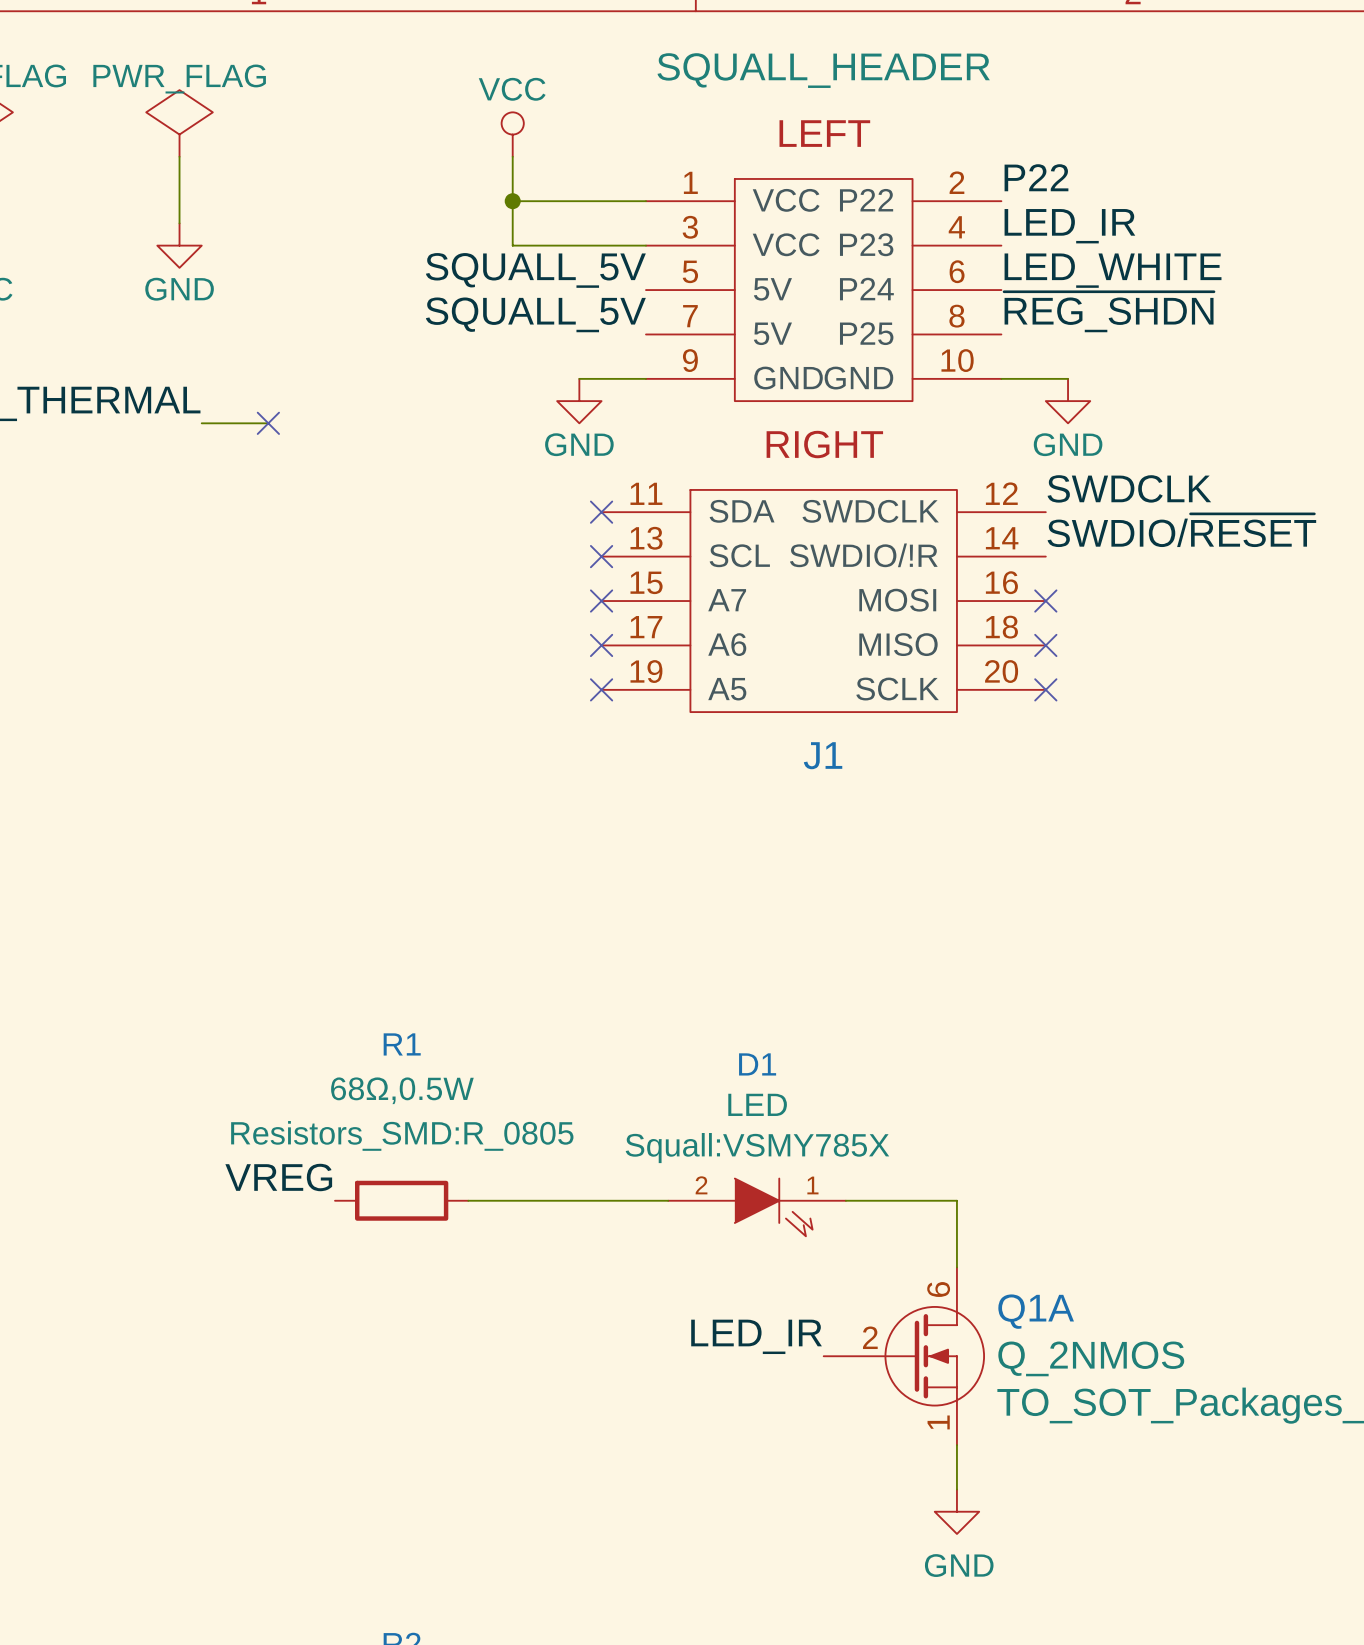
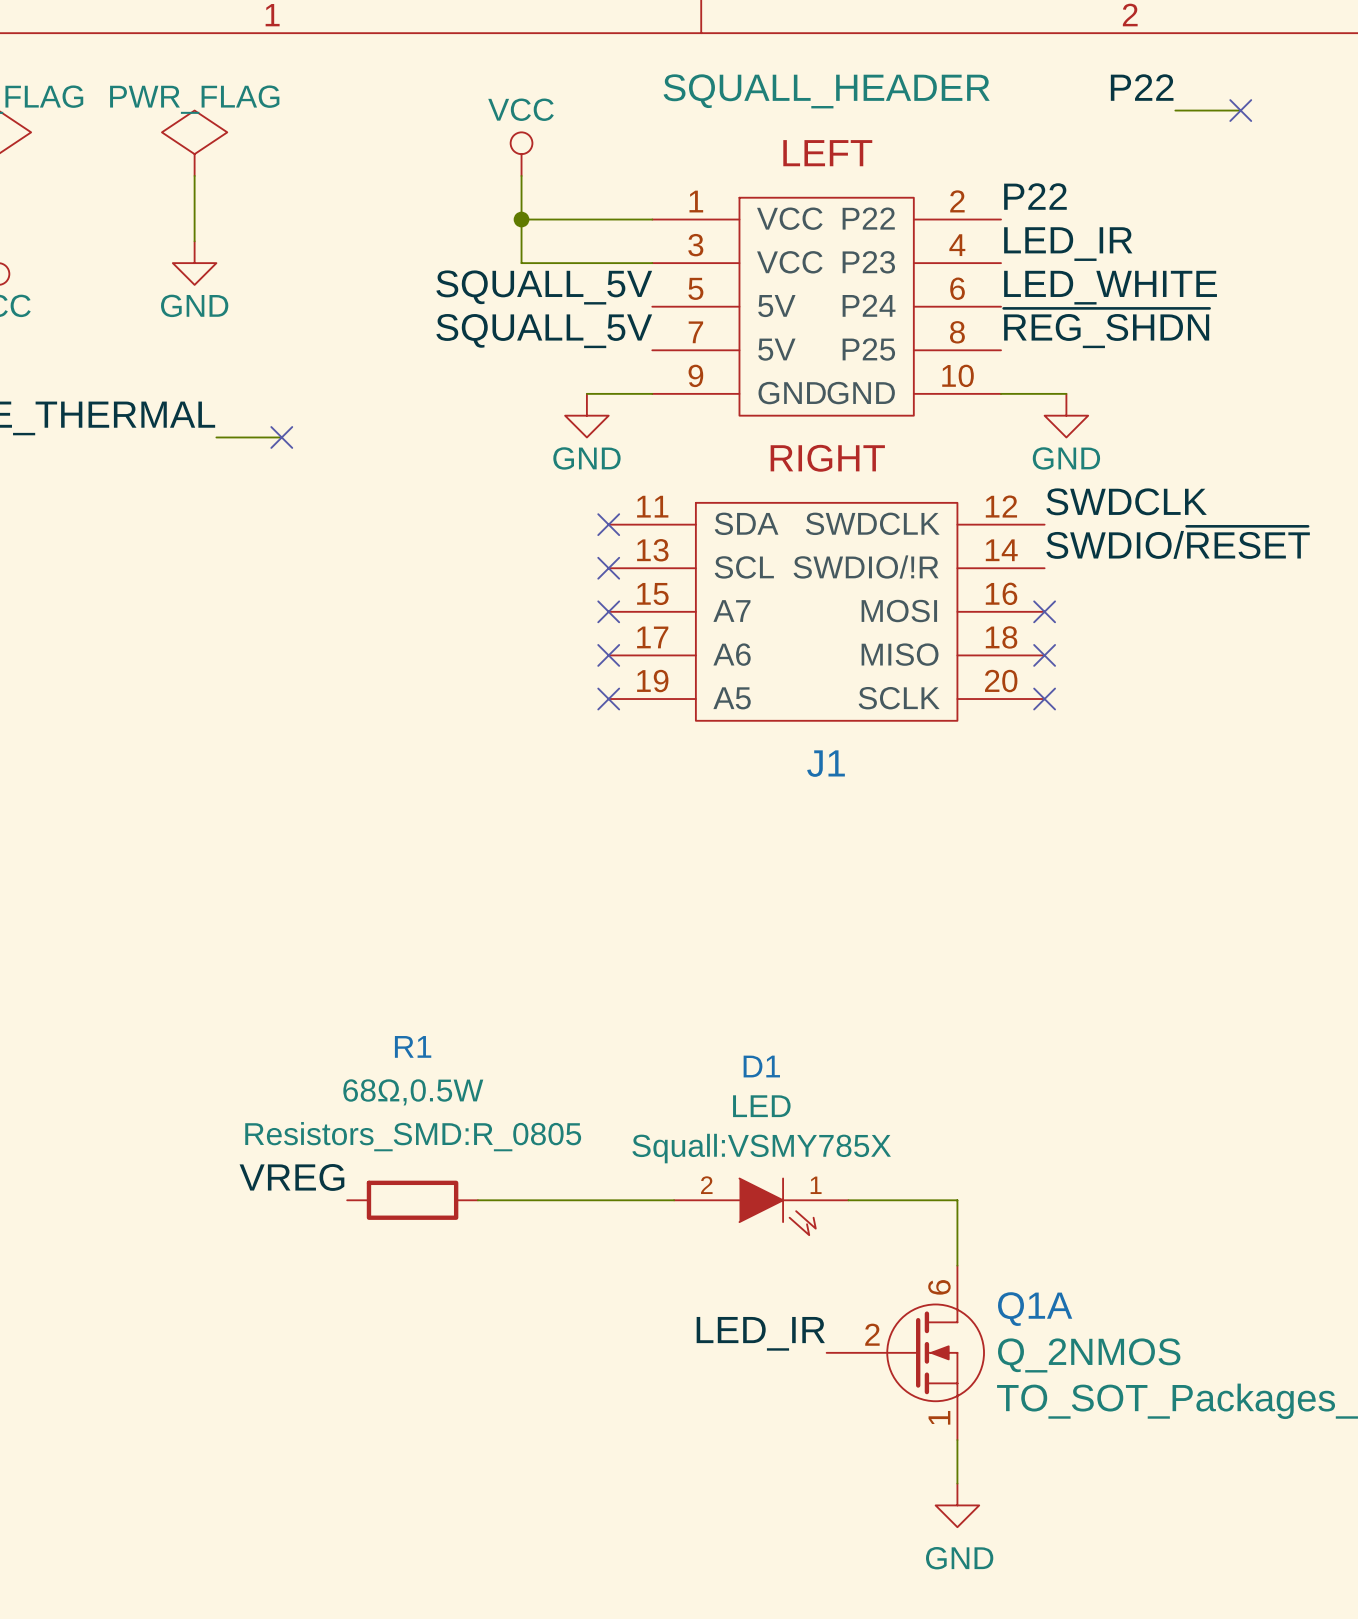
label: none -> P22 (1142, 87)
wire: none -> (1175, 110) (1240, 110)
no-connect mark: none -> (1240, 110)

